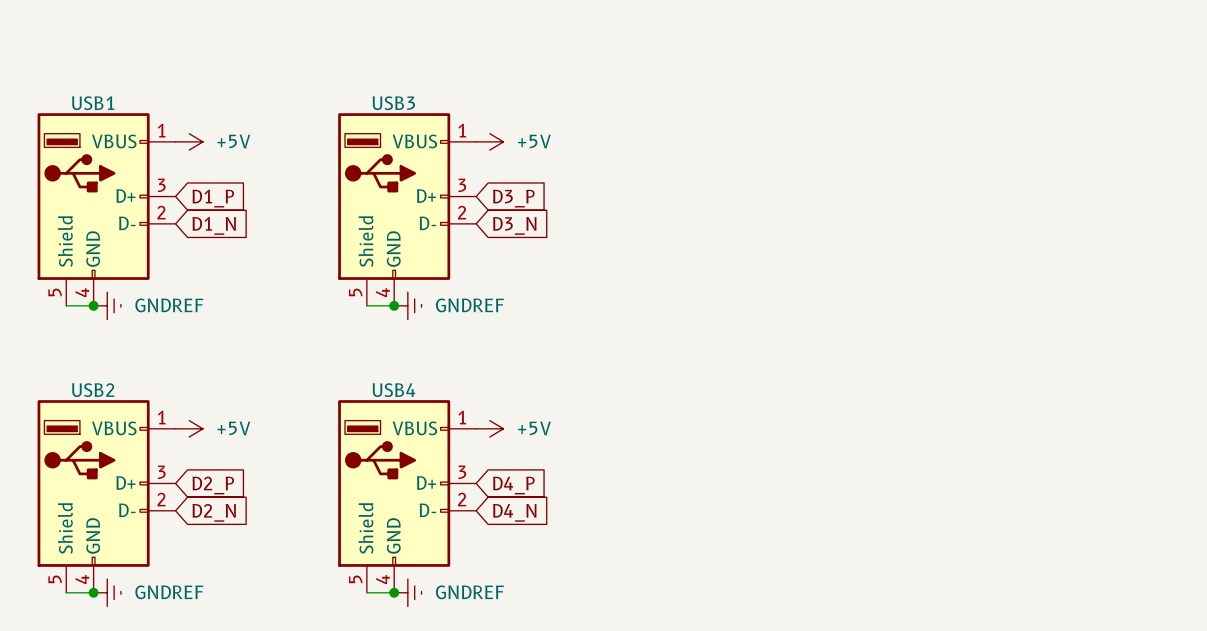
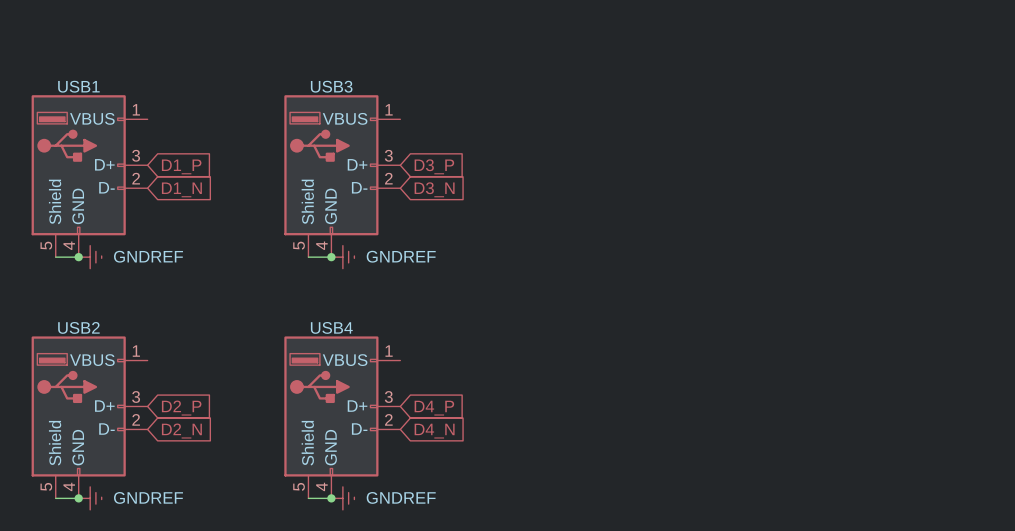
power symbol: +5V (189, 141) -> none
power symbol: +5V (489, 141) -> none
power symbol: +5V (189, 428) -> none
power symbol: +5V (489, 428) -> none

